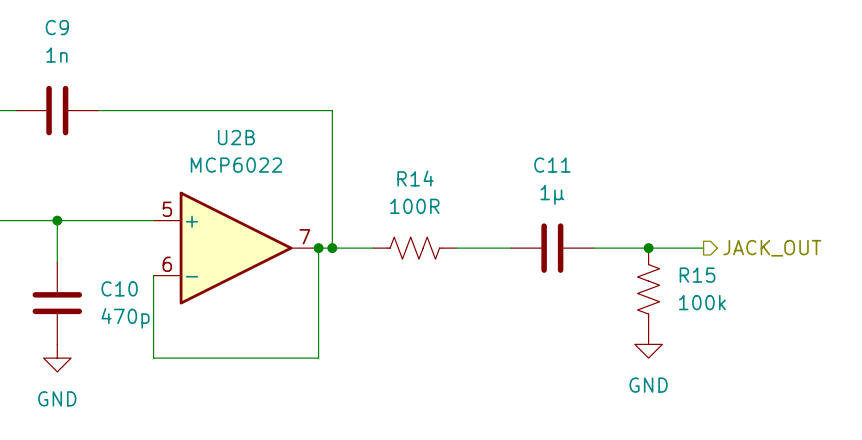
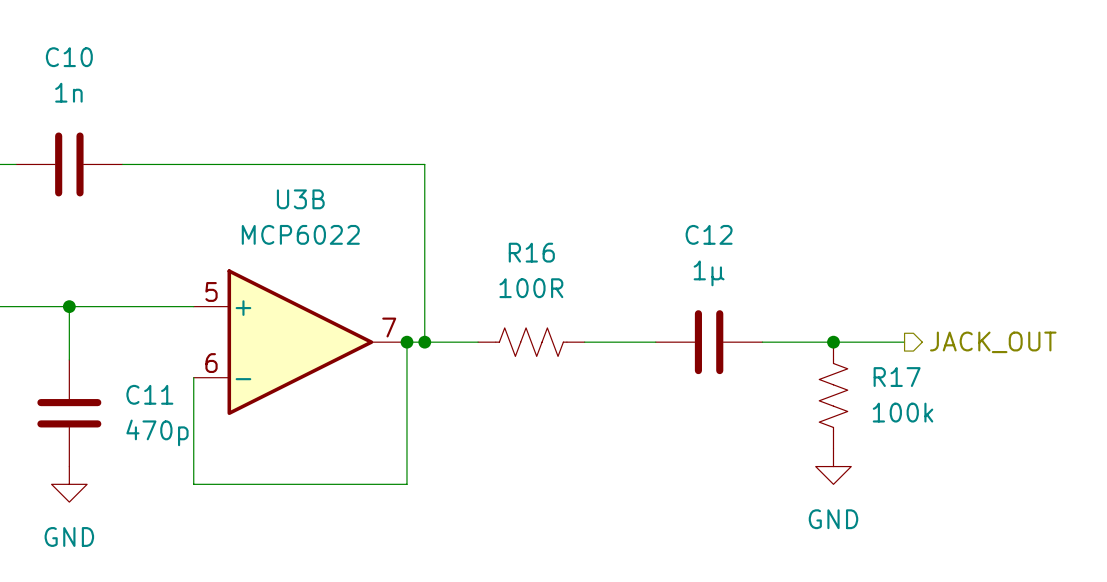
C9 name: C9 (57, 27) -> C10 (69, 57)
U2B name: U2B (236, 137) -> U3B (300, 199)
C11 name: C11 (552, 165) -> C12 (709, 234)
R14 name: R14 (415, 178) -> R16 (531, 252)
R15 name: R15 (697, 275) -> R17 (897, 377)
C10 name: C10 (119, 288) -> C11 (149, 394)

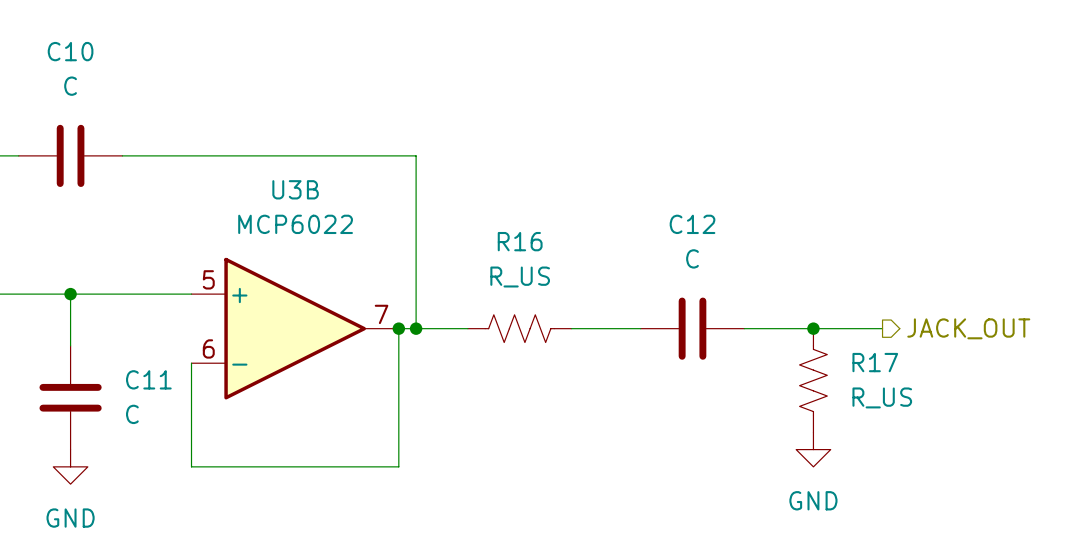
C10 value: 1n (68, 92) -> C (70, 86)
C12 value: 1µ (709, 273) -> C (692, 258)
R16 value: 100R (531, 288) -> R_US (520, 277)
R17 value: 100k (903, 412) -> R_US (882, 397)
C11 value: 470p (157, 432) -> C (132, 414)

